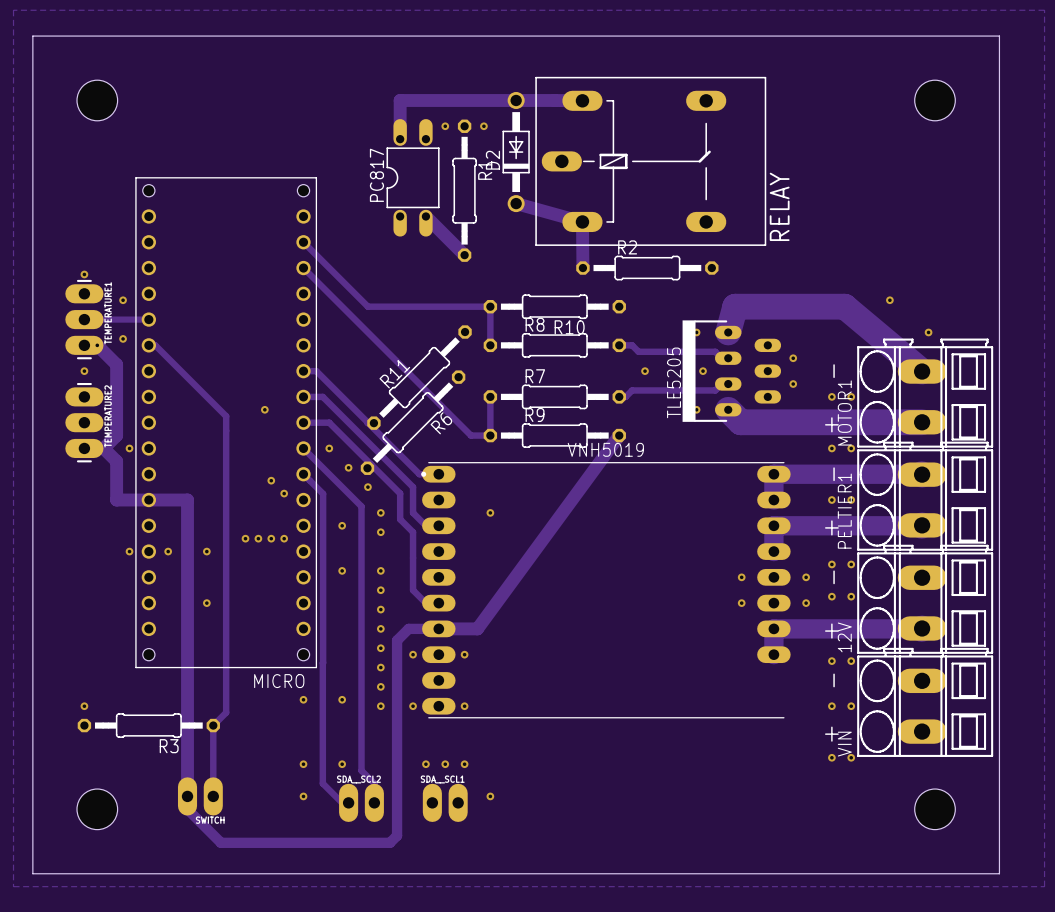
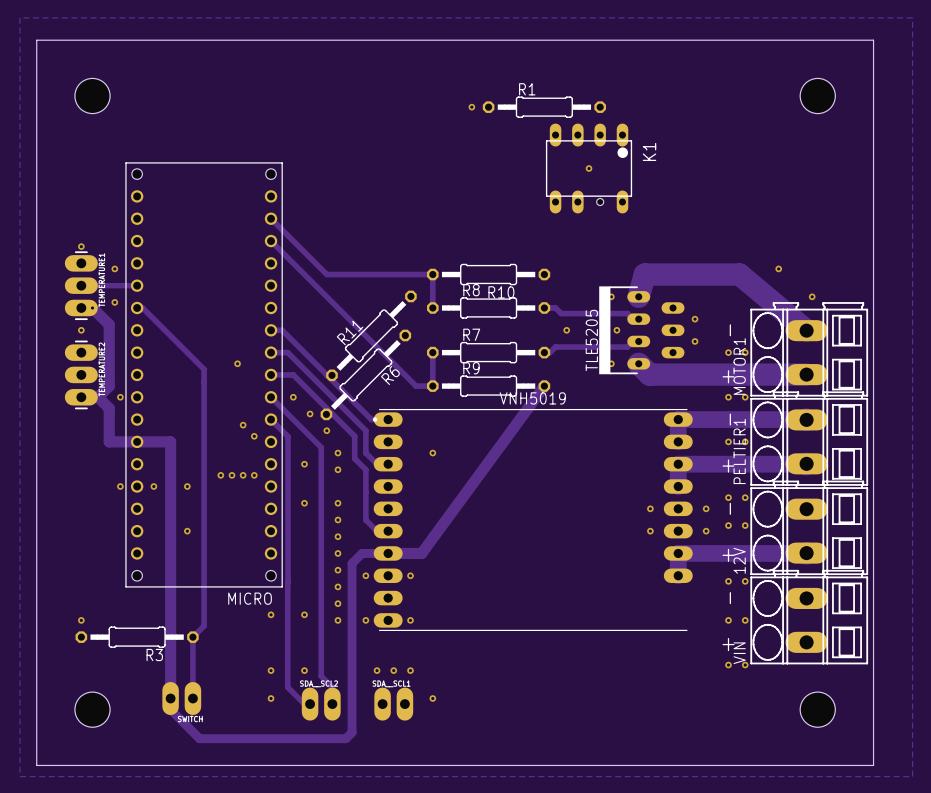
track: (582, 100) (400, 100) (400, 139) -> none
via: none -> (471, 107)
via: (445, 126) -> none
via: (483, 126) -> none
D2: (516, 152) -> none
RELAY: (650, 161) -> none
R1 name position: R1 (485, 170) -> R1 (527, 89)
PC817: (413, 177) -> none
K1: none -> (589, 168)
via: none -> (589, 168)
R1 rotation: 0° (464, 190) -> 90° clockwise (544, 107)
R1 position: (464, 190) -> (544, 107)
track: (516, 203) (582, 221) (582, 268) -> none
track: (425, 216) (464, 255) -> none
hole: none -> (600, 201)
R2: (647, 268) -> none

